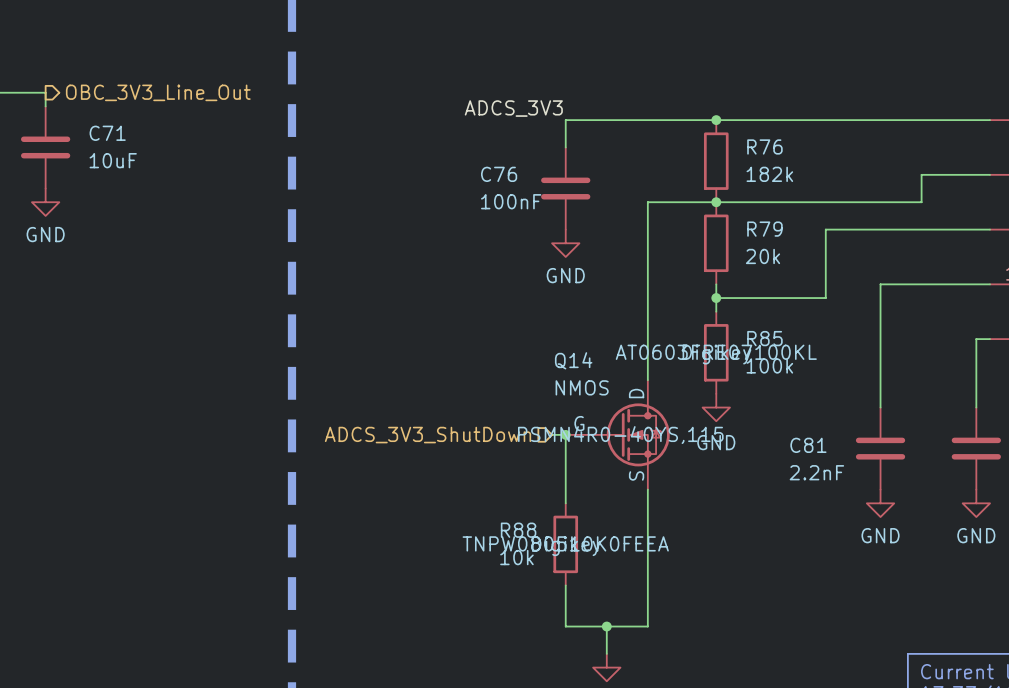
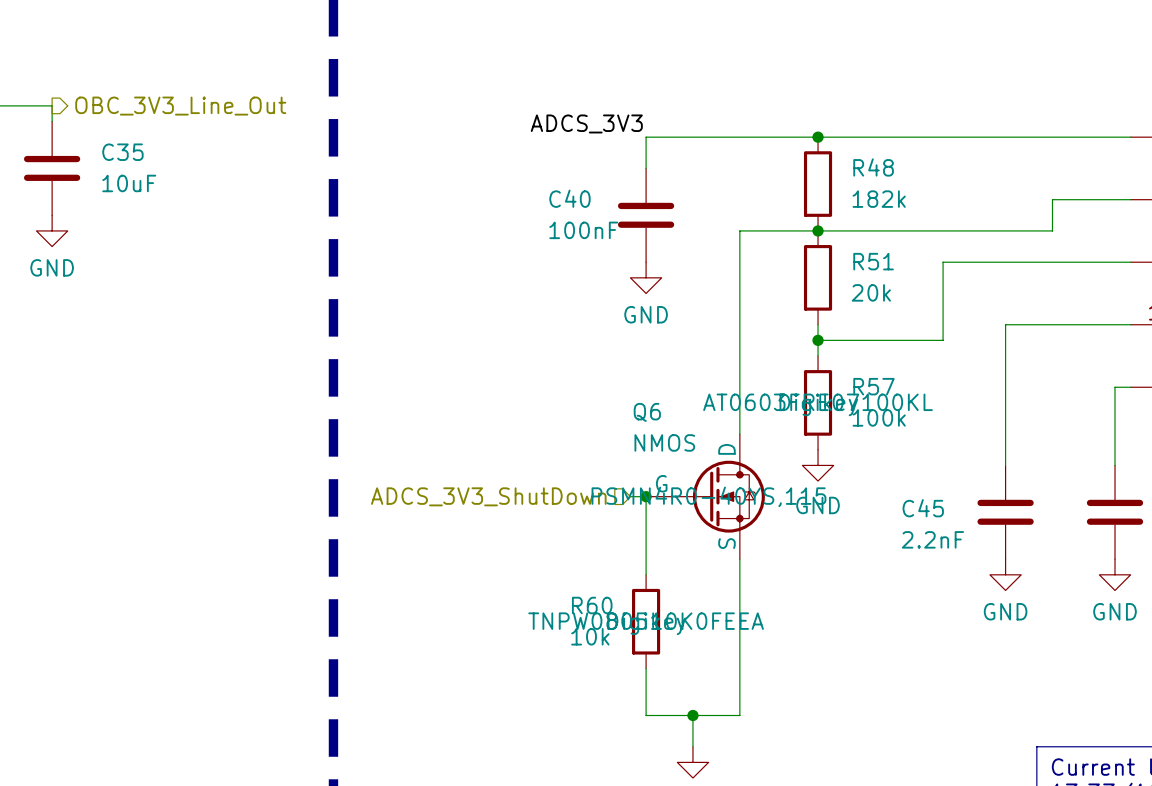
C71 name: C71 (107, 133) -> C35 (122, 152)
R76 name: R76 (764, 146) -> R48 (873, 167)
C76 name: C76 (499, 174) -> C40 (569, 198)
R79 name: R79 (764, 229) -> R51 (873, 261)
R85 name: R85 (764, 338) -> R57 (873, 386)
Q14 name: Q14 (573, 360) -> Q6 (647, 412)
C81 name: C81 (808, 445) -> C45 (923, 508)
R88 name: R88 (518, 530) -> R60 (592, 605)

